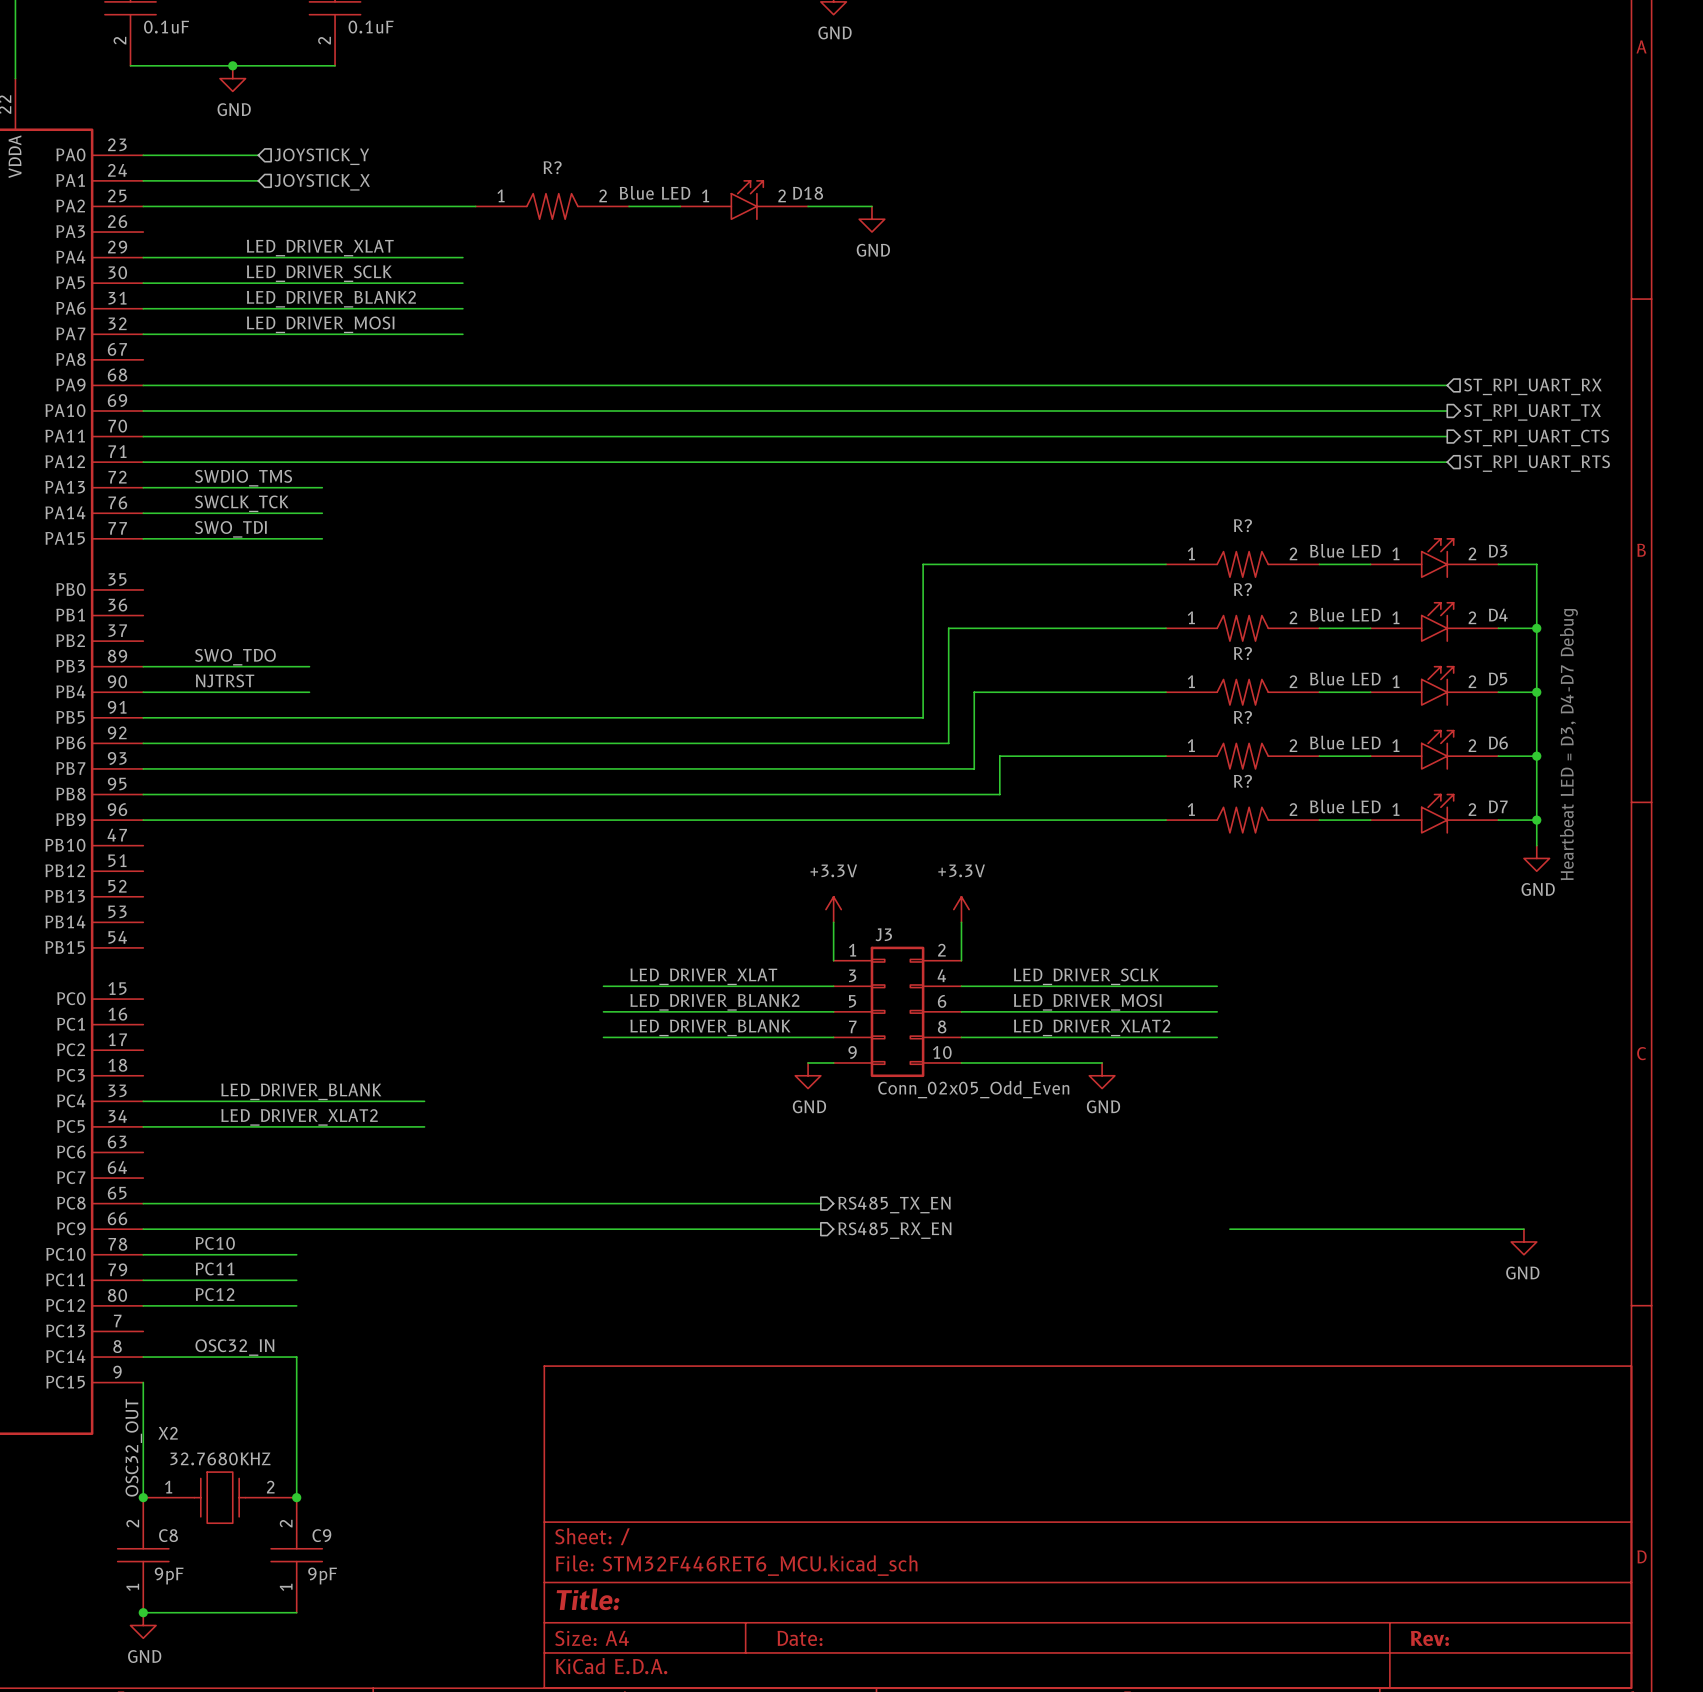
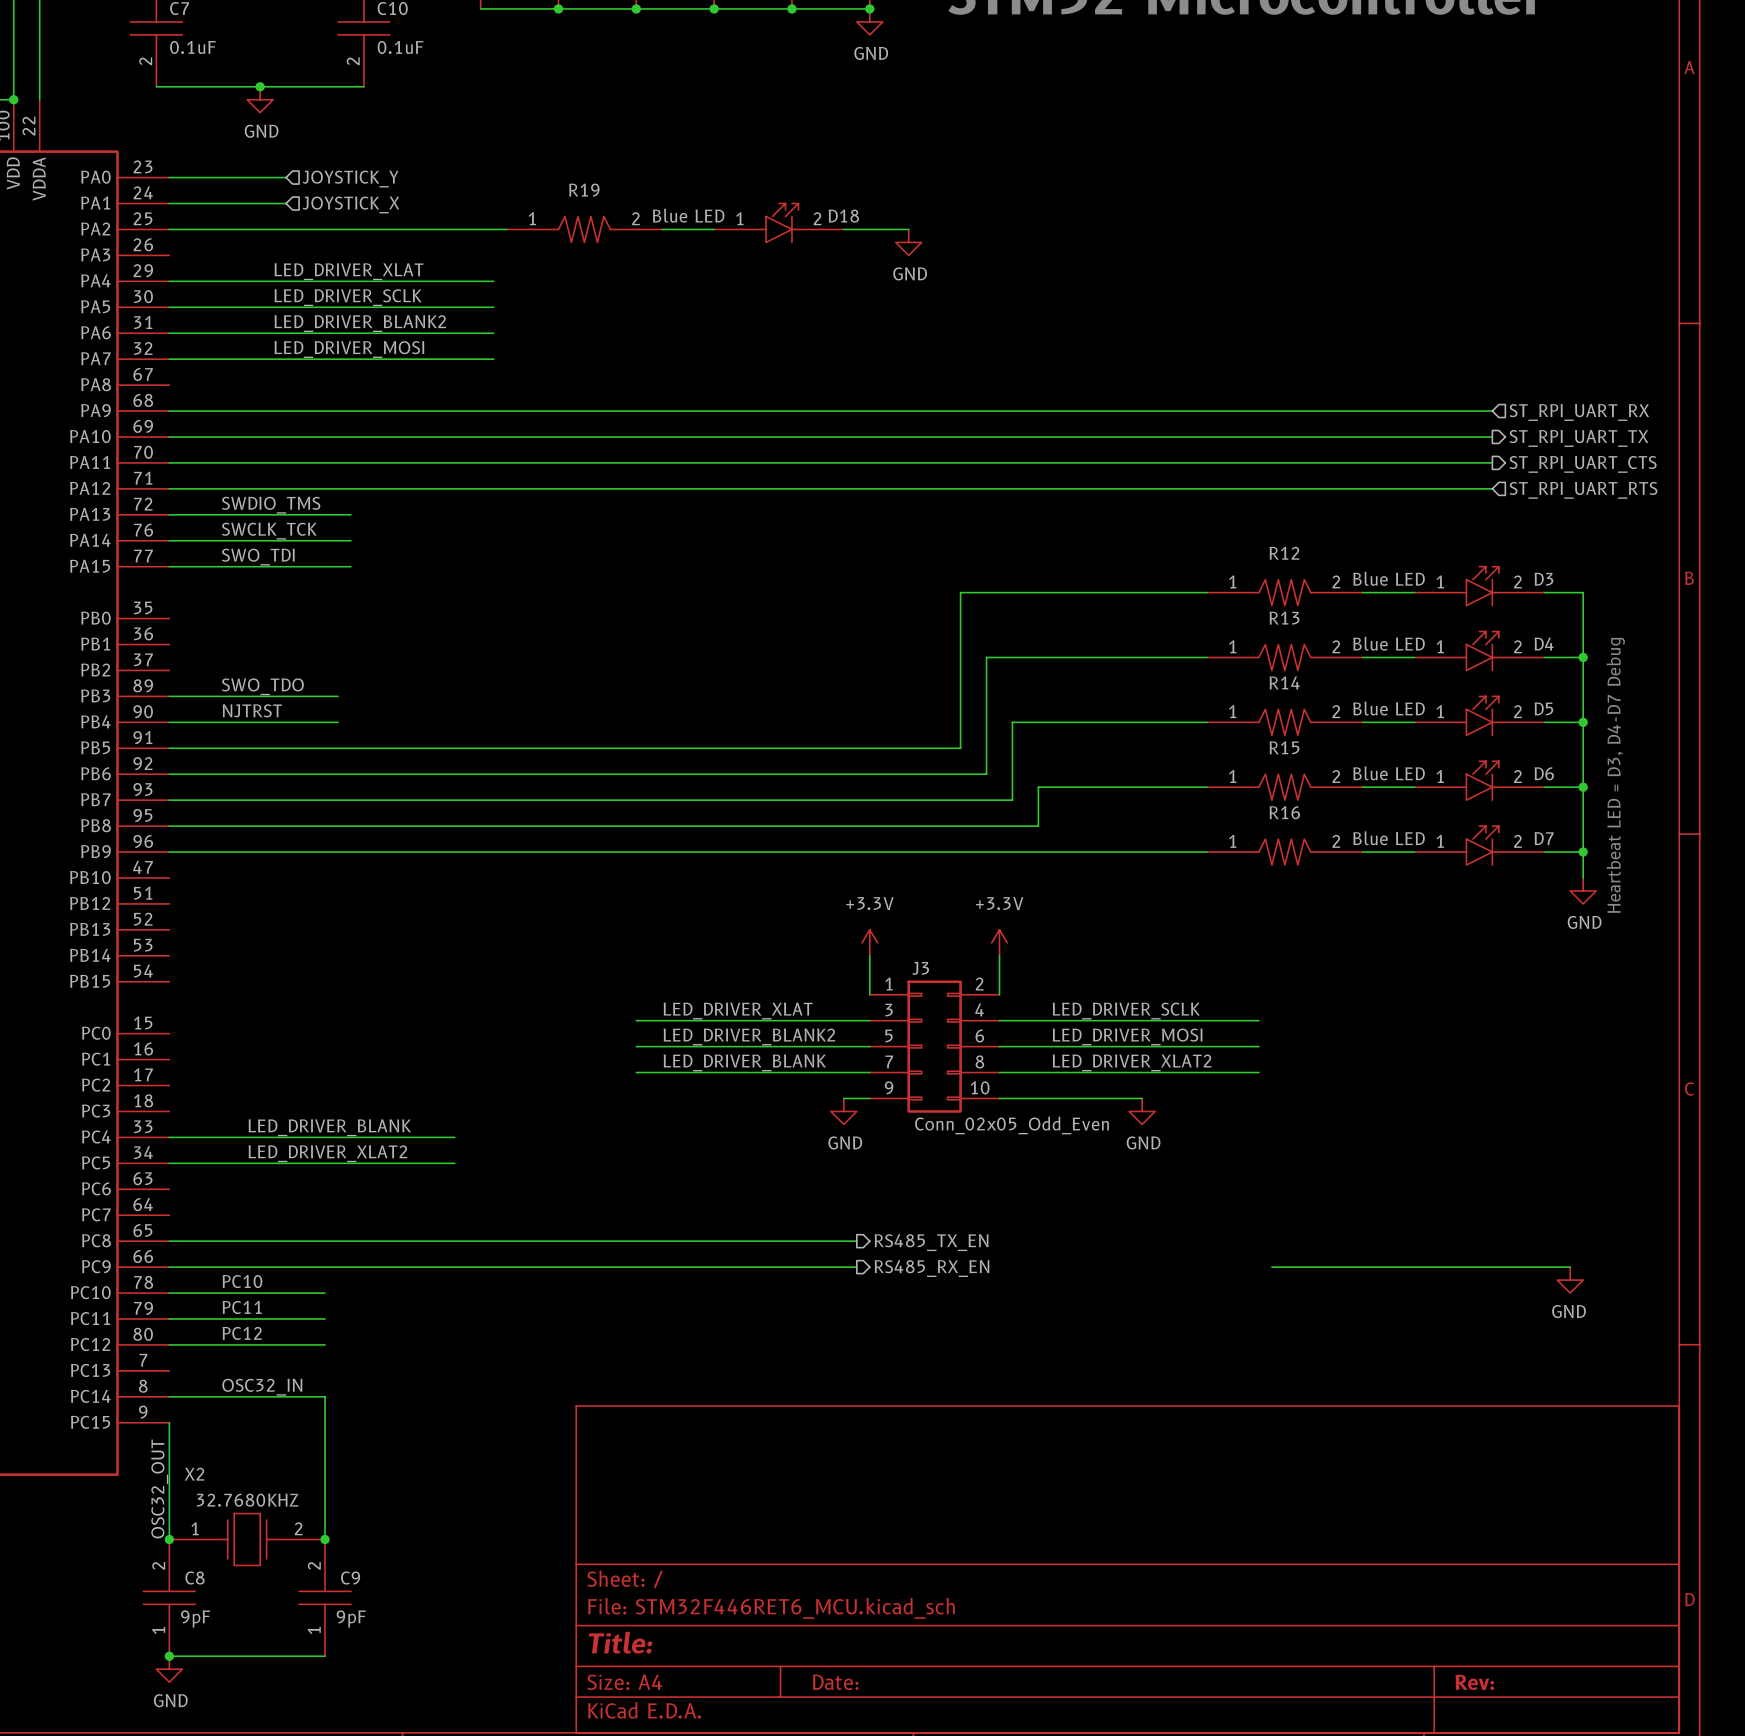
R? name: R? (552, 167) -> R19 (584, 190)
R? name: R? (1242, 525) -> R12 (1284, 553)
R? name: R? (1242, 589) -> R13 (1284, 618)
R? name: R? (1242, 653) -> R14 (1284, 682)
R? name: R? (1242, 717) -> R15 (1284, 747)
R? name: R? (1242, 781) -> R16 (1284, 812)

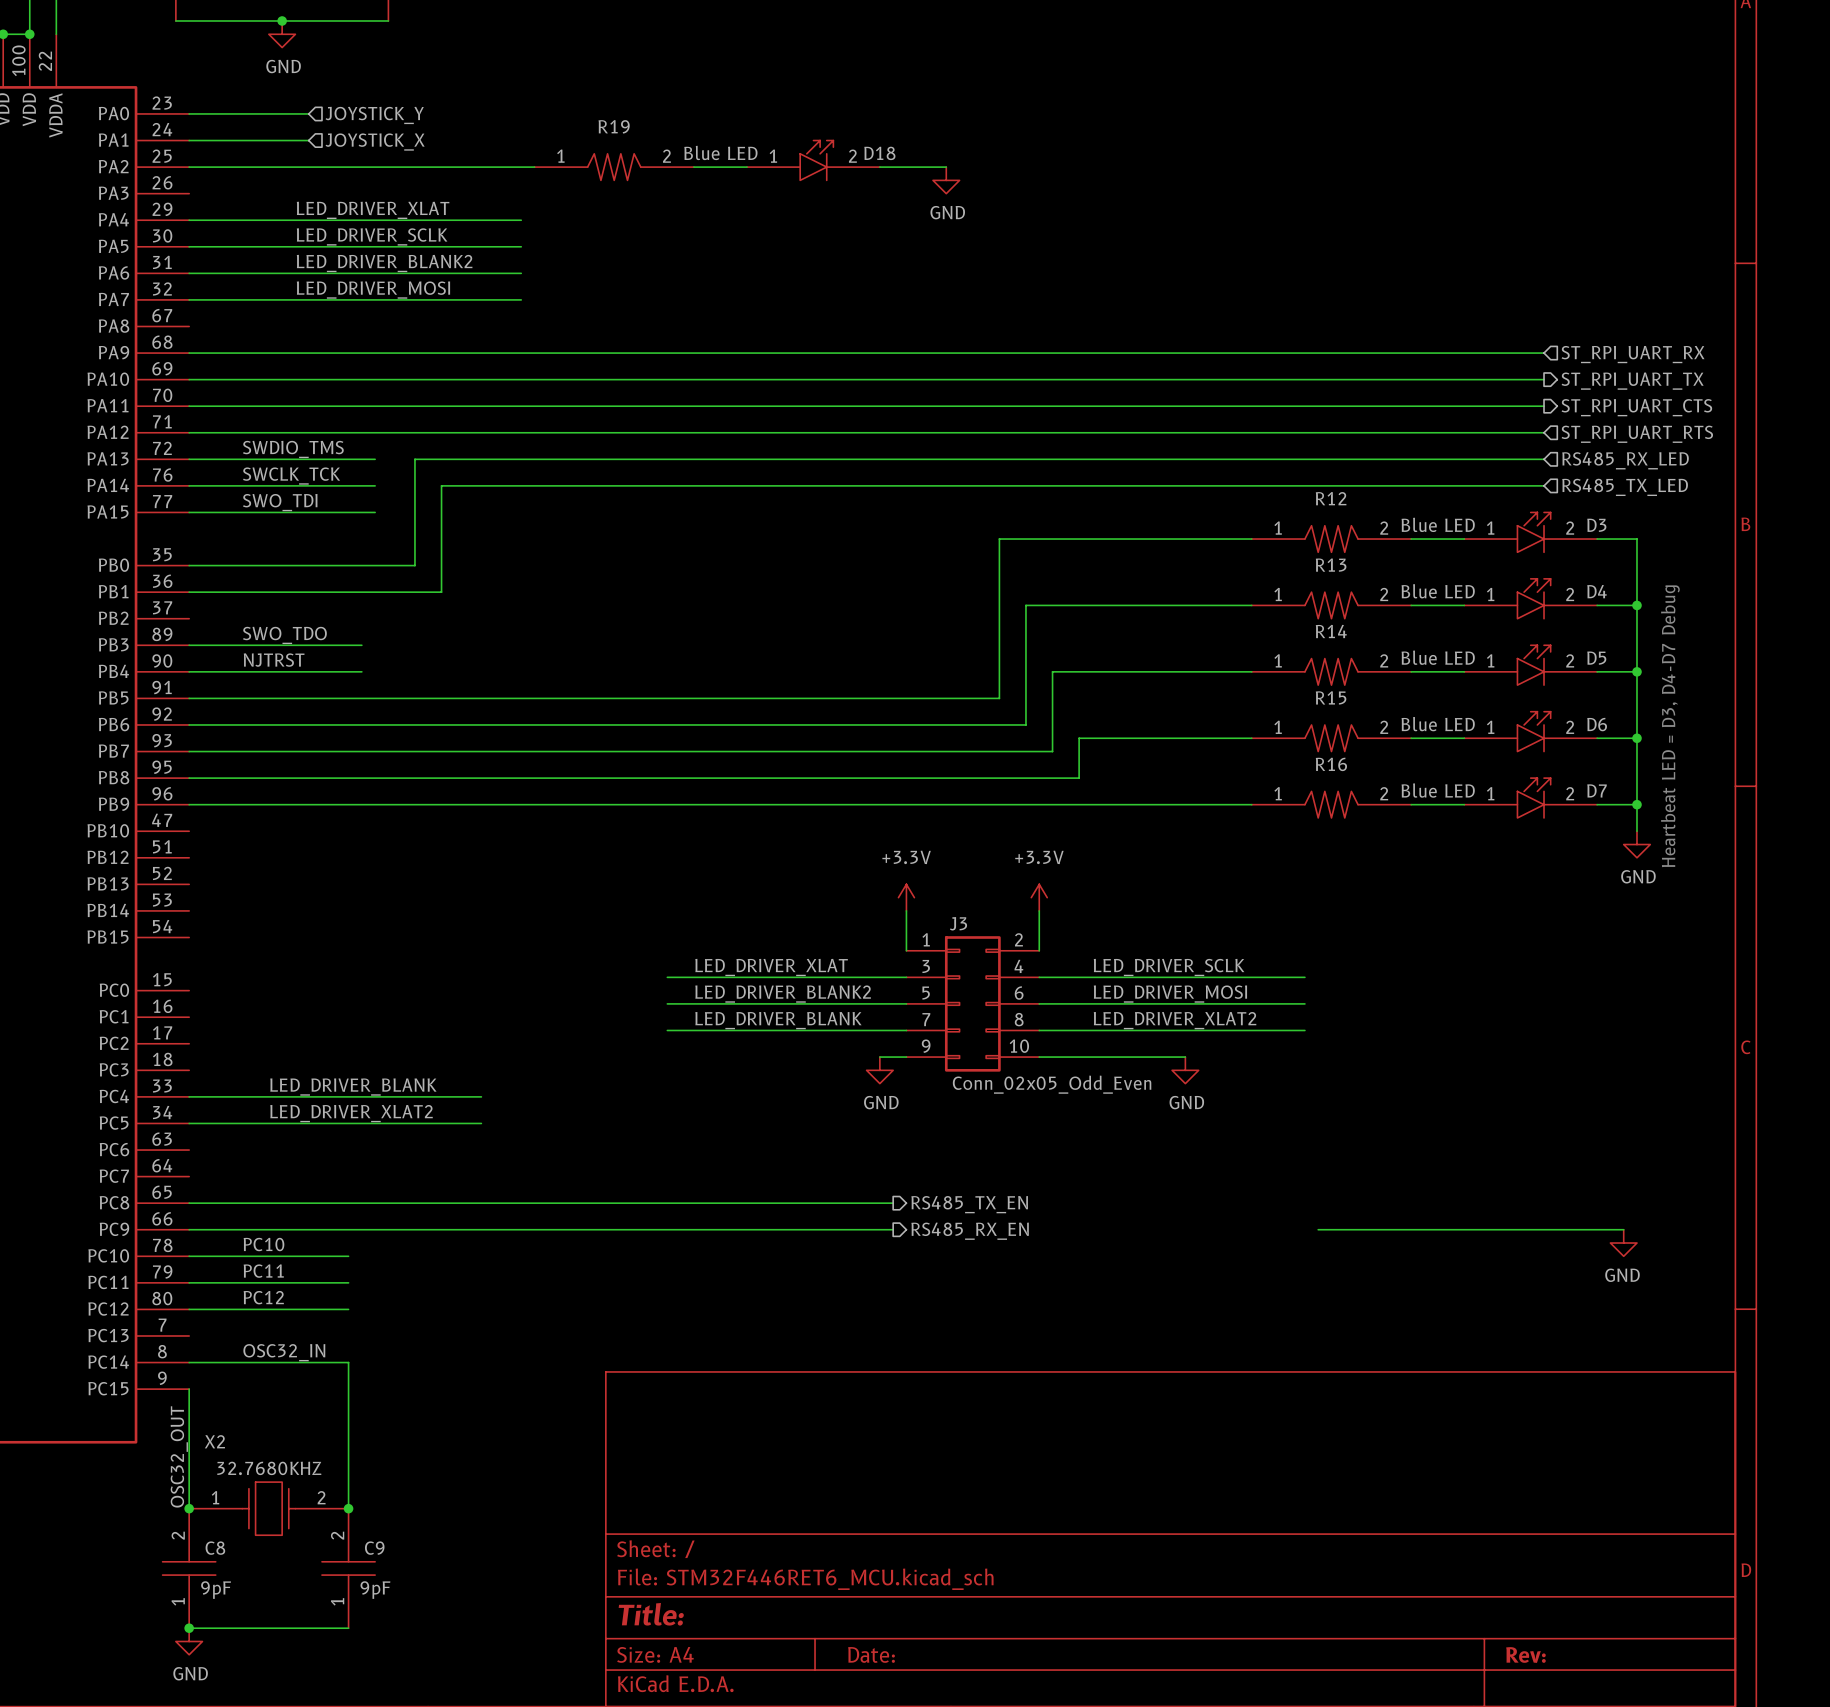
wire: none -> (1544, 459) (414, 459) (414, 565) (189, 565)
hierarchical label: none -> RS485_RX_LED (1625, 460)
wire: none -> (1544, 485) (441, 485) (441, 592) (189, 592)
hierarchical label: none -> RS485_TX_LED (1625, 487)

